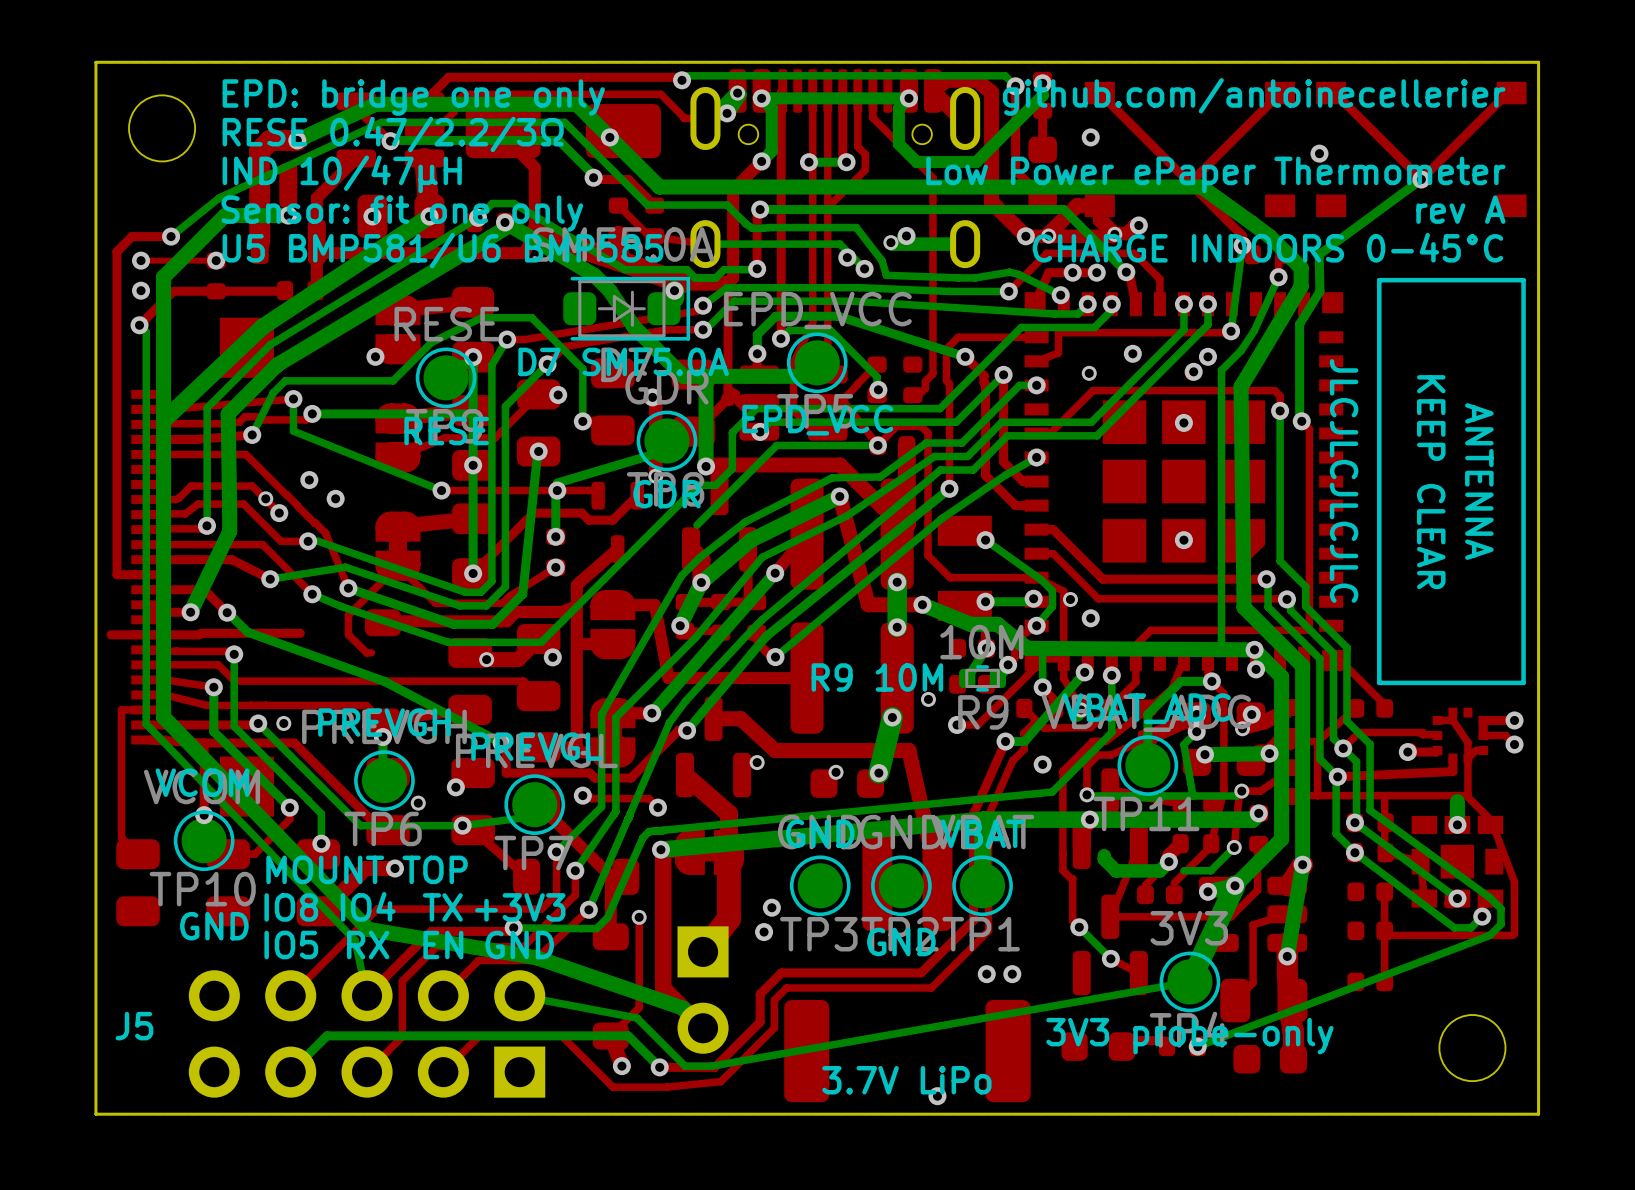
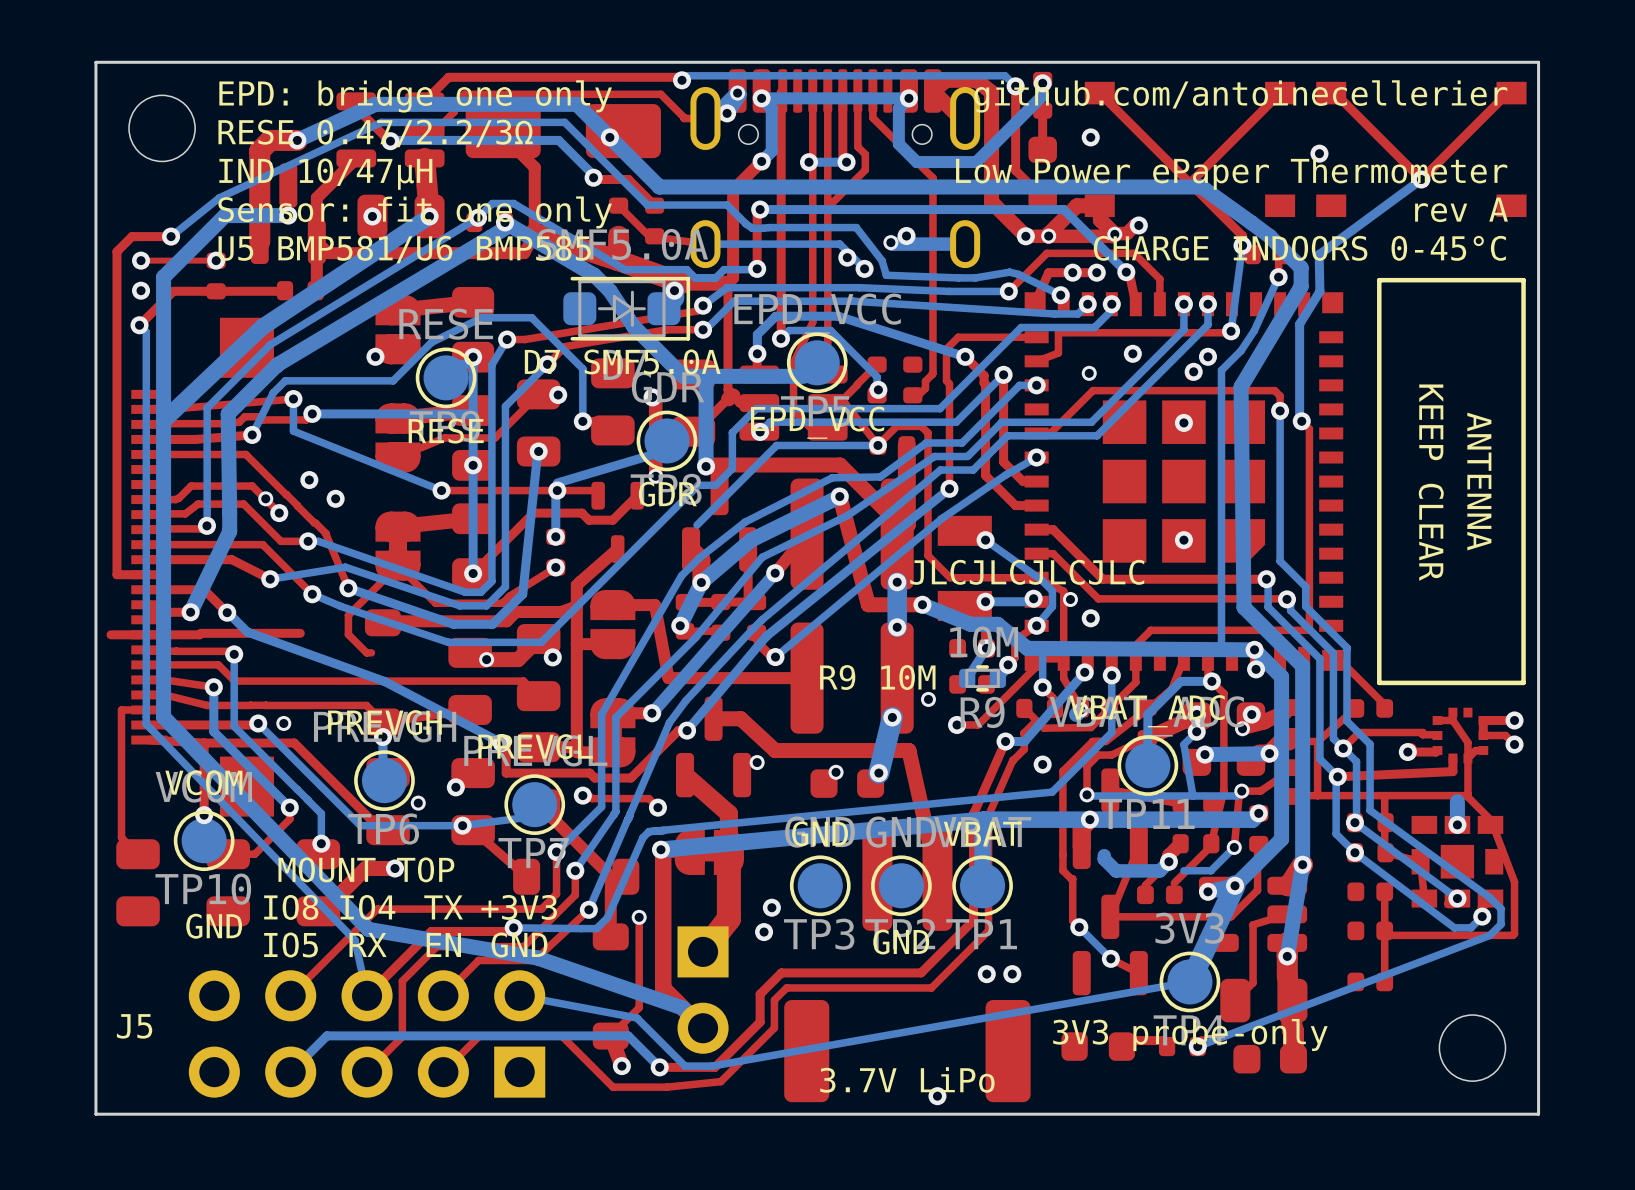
text rotation: 0° (1344, 480) -> 90° counterclockwise (1027, 572)
text position: JLCJLCJLCJLC (1344, 480) -> JLCJLCJLCJLC (1027, 572)

